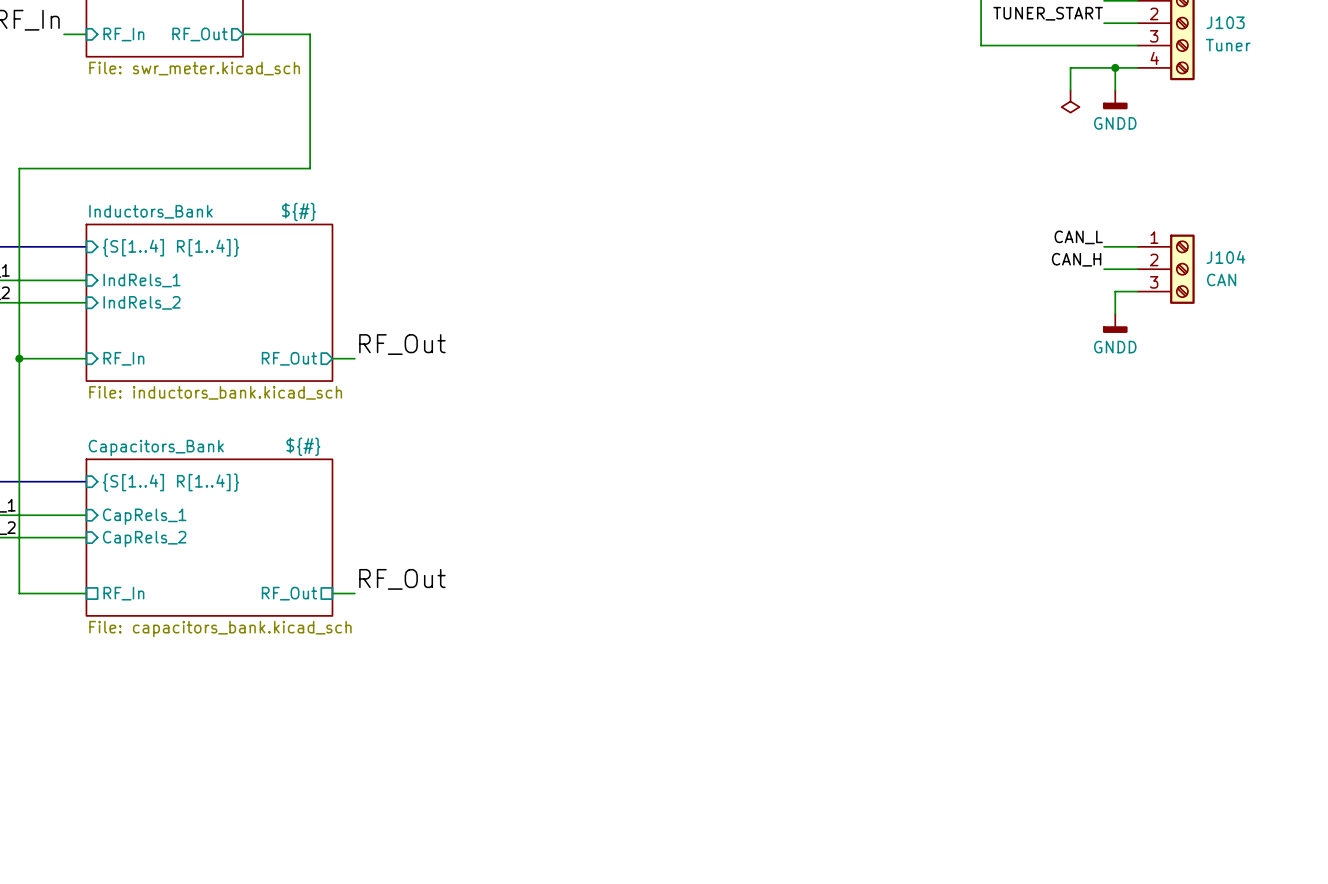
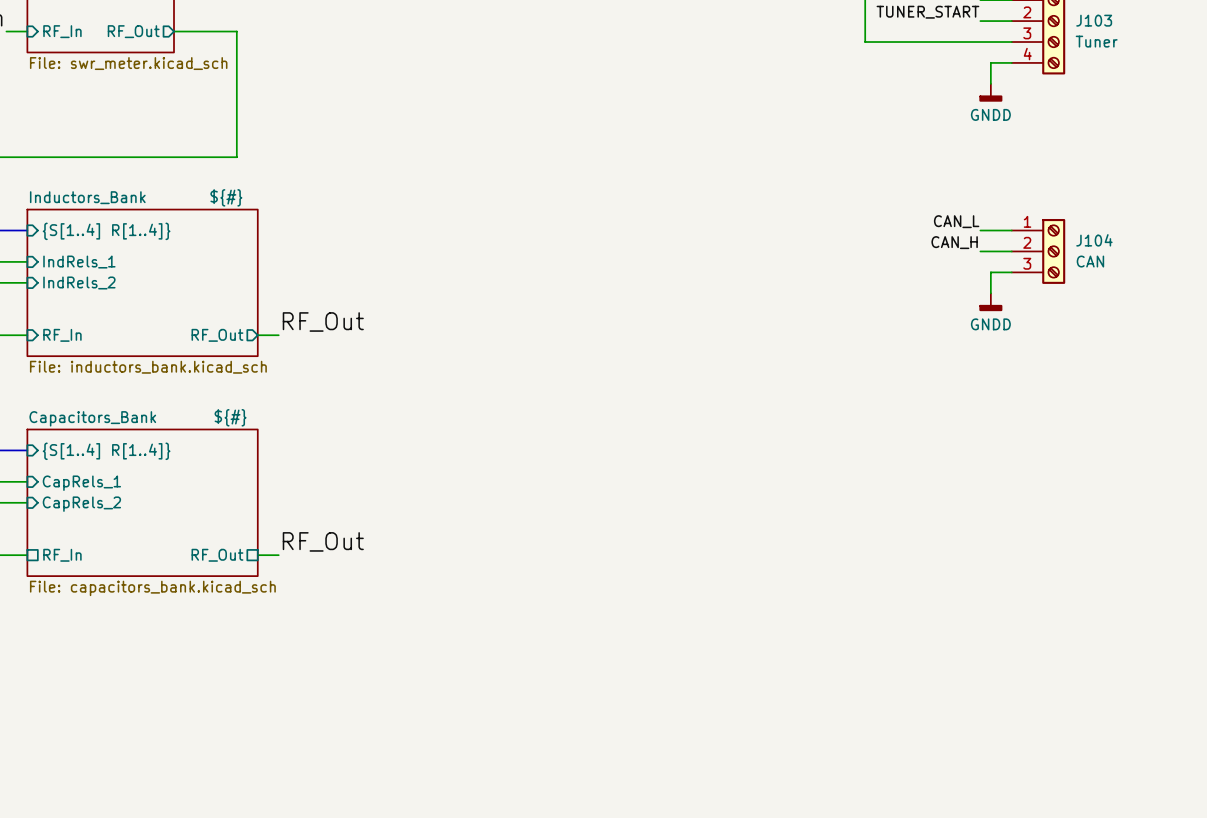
wire: (1115, 67) (1070, 67) (1070, 90) -> none
junction: (1115, 67) -> none
power symbol: (1070, 101) -> none

